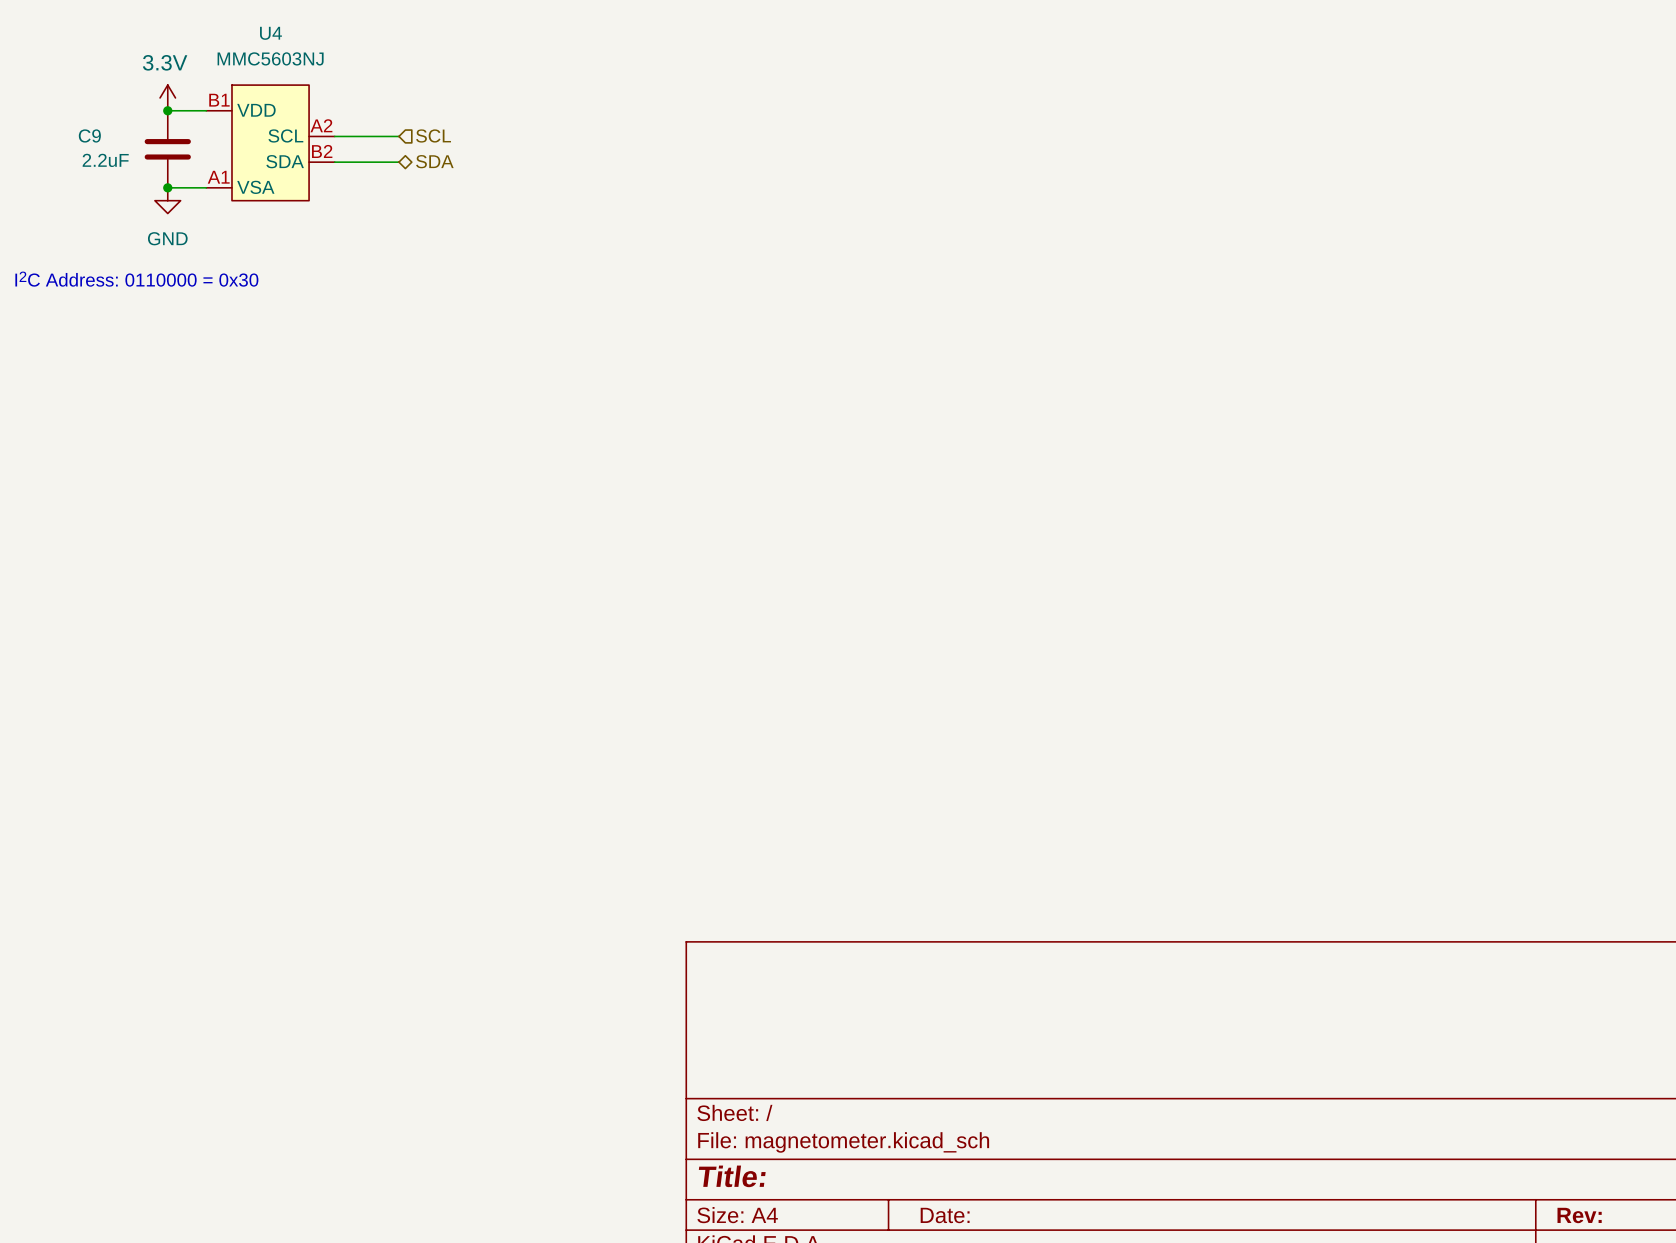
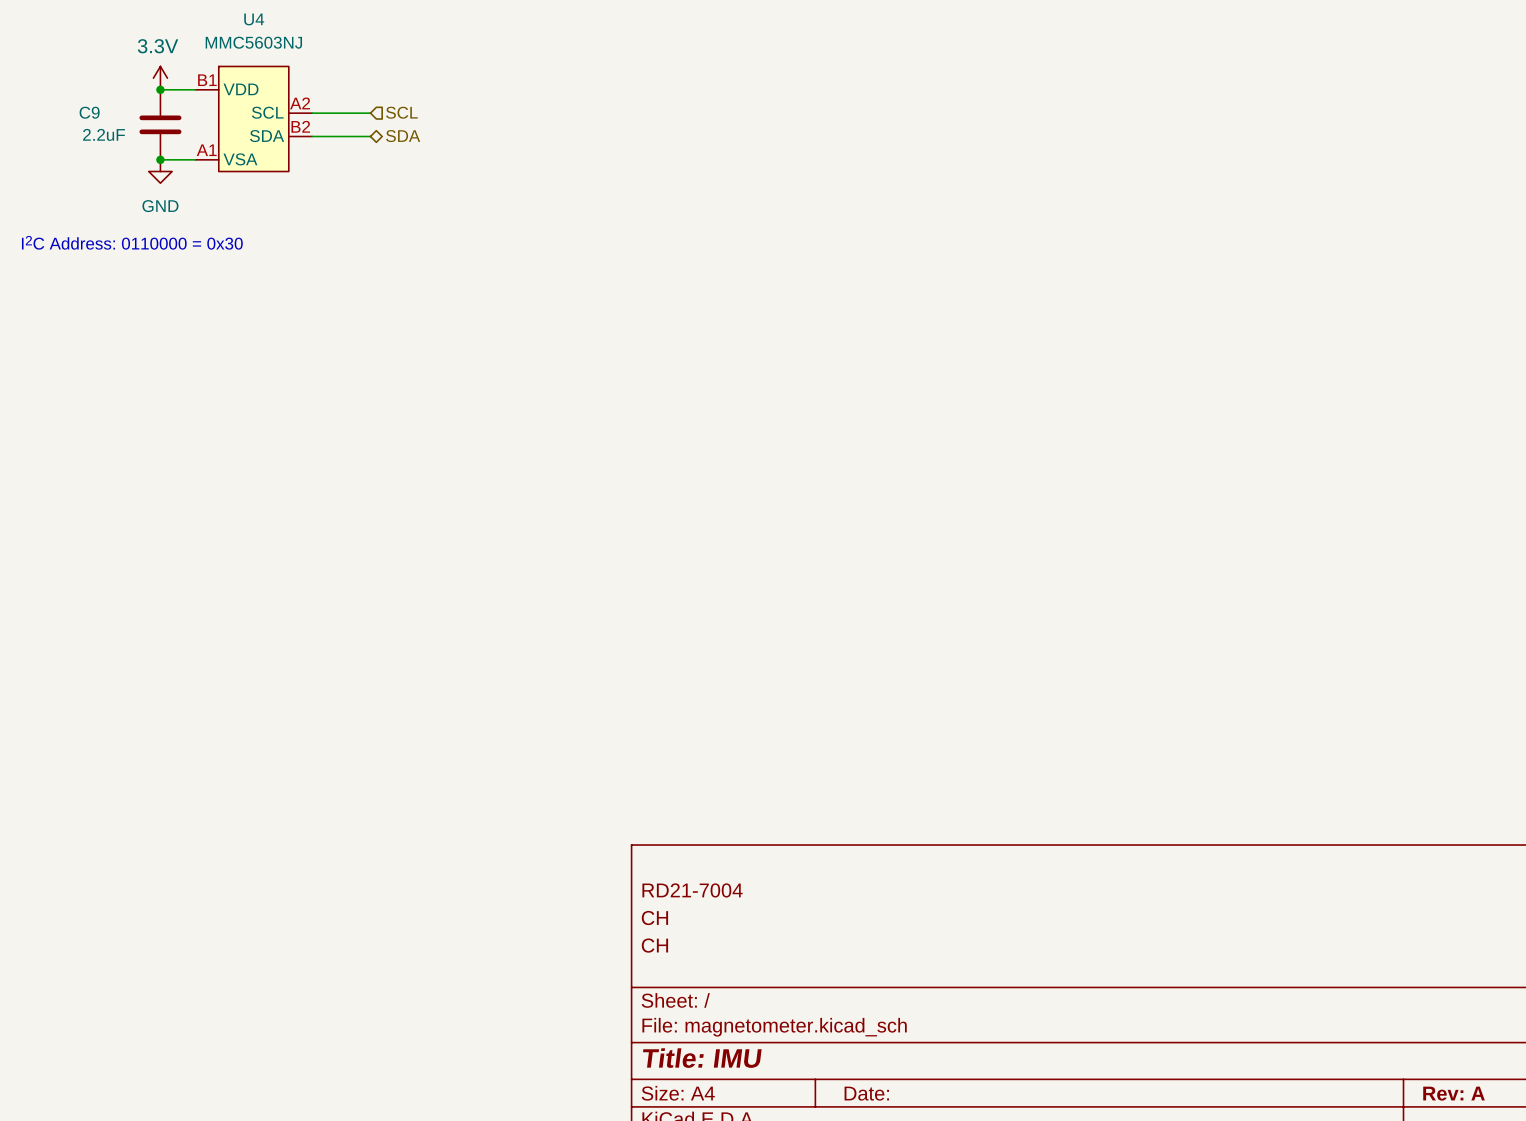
title block: none -> RD21-7004 (692, 890)
title block: none -> CH (654, 918)
title block: none -> CH (654, 945)
title block: Title: (732, 1176) -> Title: IMU (702, 1058)
title block: Rev: (1579, 1215) -> Rev: A (1454, 1093)

